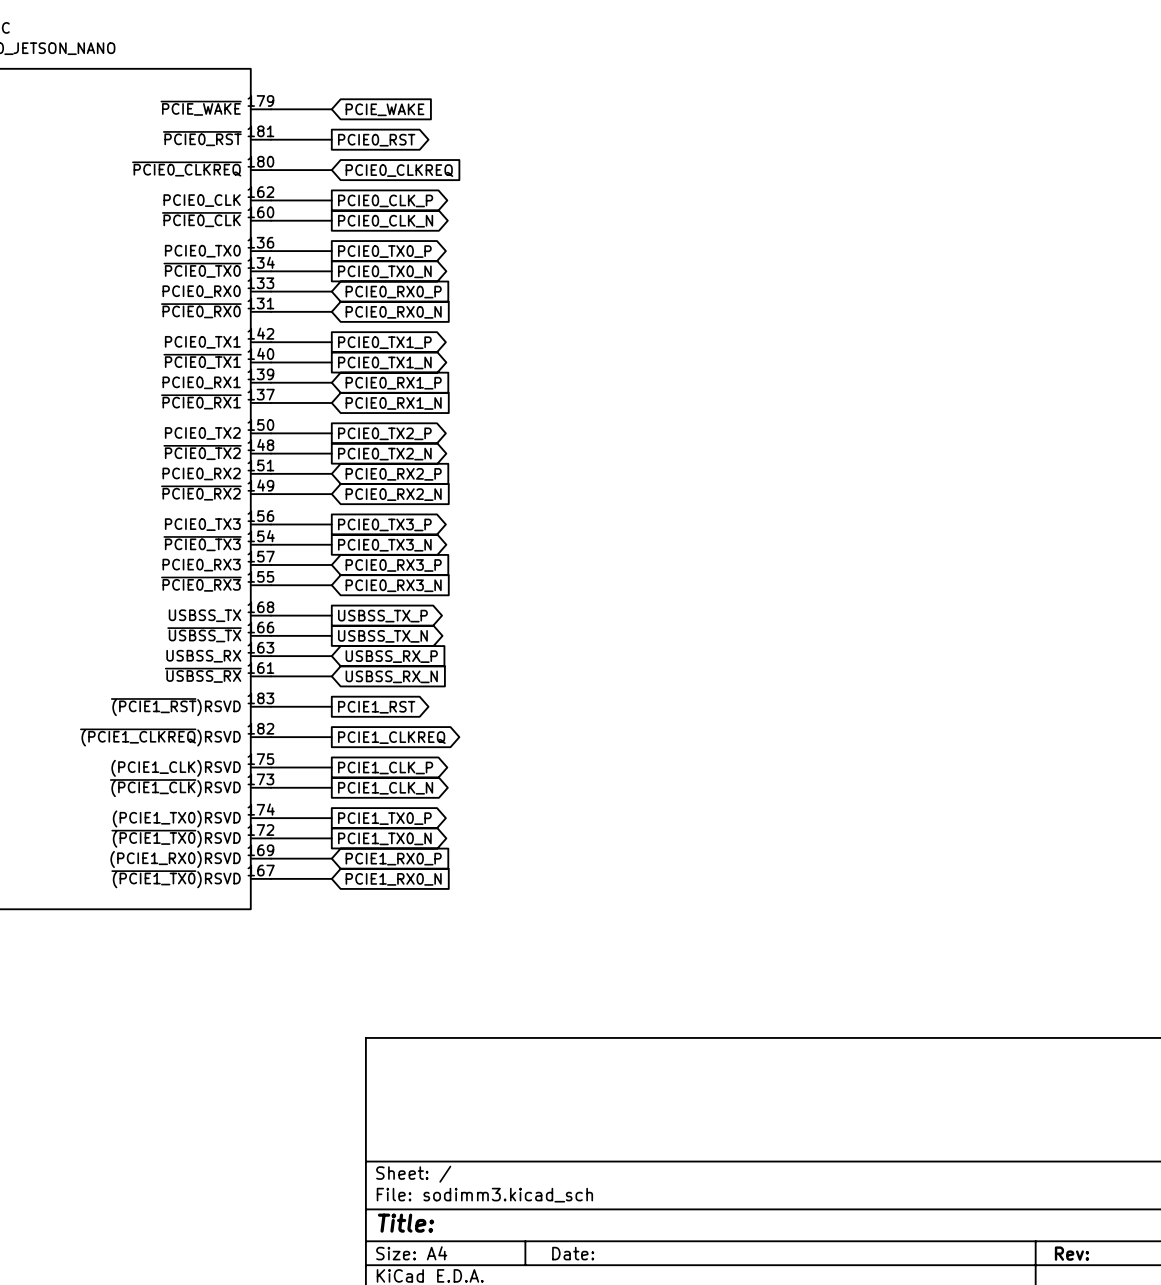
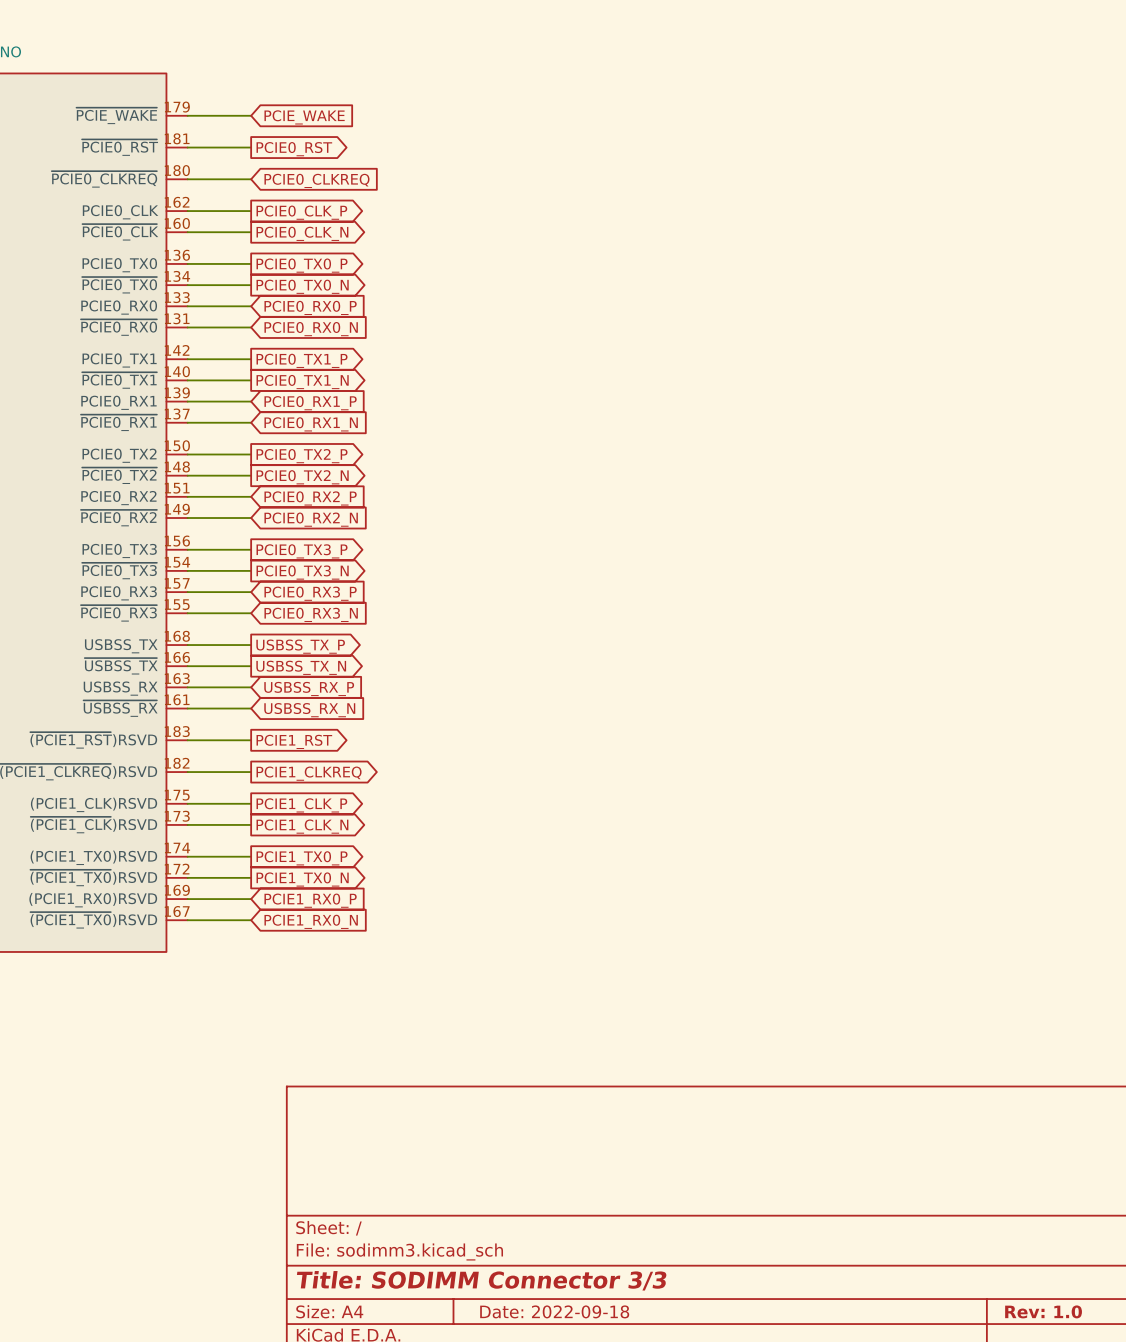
title block: Title: (406, 1223) -> Title: SODIMM Connector 3/3 (481, 1280)
title block: Date: (573, 1253) -> Date: 2022-09-18 (554, 1311)
title block: Rev: (1071, 1253) -> Rev: 1.0 (1043, 1311)

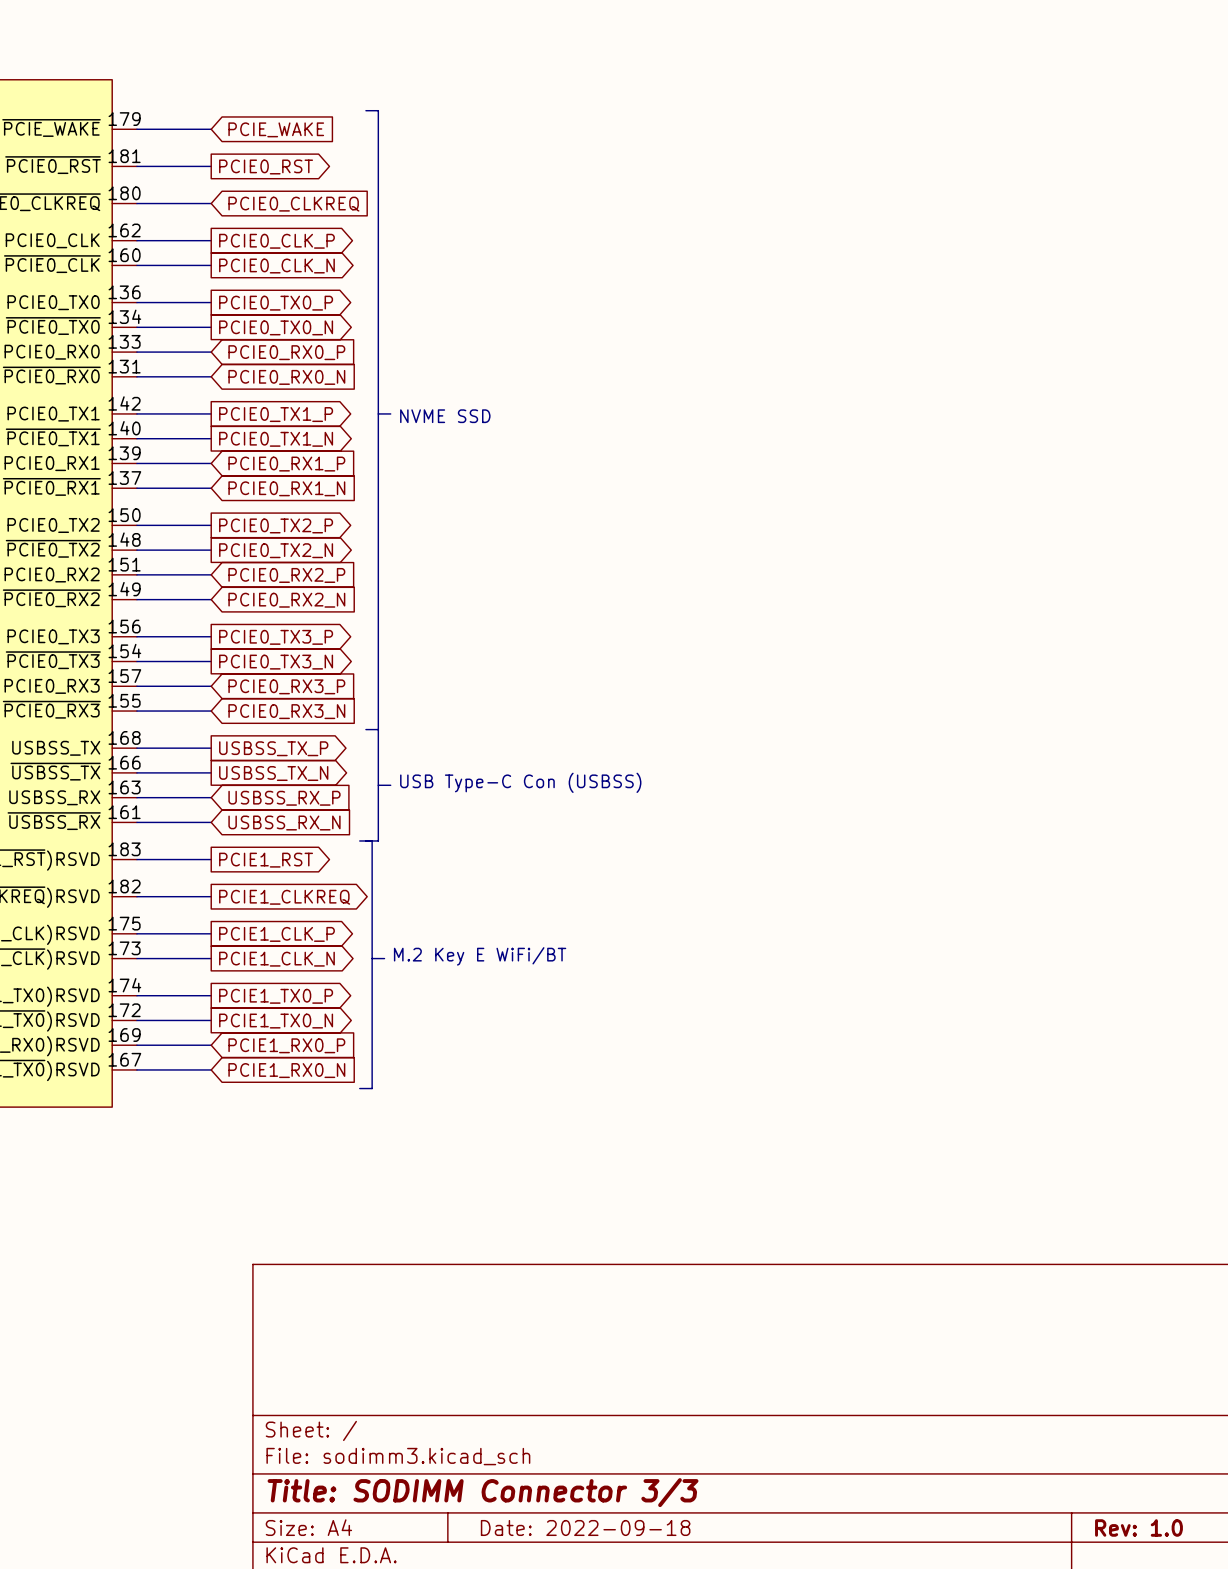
line: none -> (365, 110) (378, 110) (378, 840) (359, 840)
line: none -> (378, 413) (390, 413)
text: none -> NVME SSD (445, 416)
line: none -> (365, 729) (378, 729)
text: none -> USB Type-C Con (USBSS) (520, 782)
line: none -> (378, 785) (390, 785)
line: none -> (372, 840) (372, 1088) (359, 1088)
text: none -> M.2 Key E WiFi/BT (480, 956)
line: none -> (372, 958) (384, 958)

